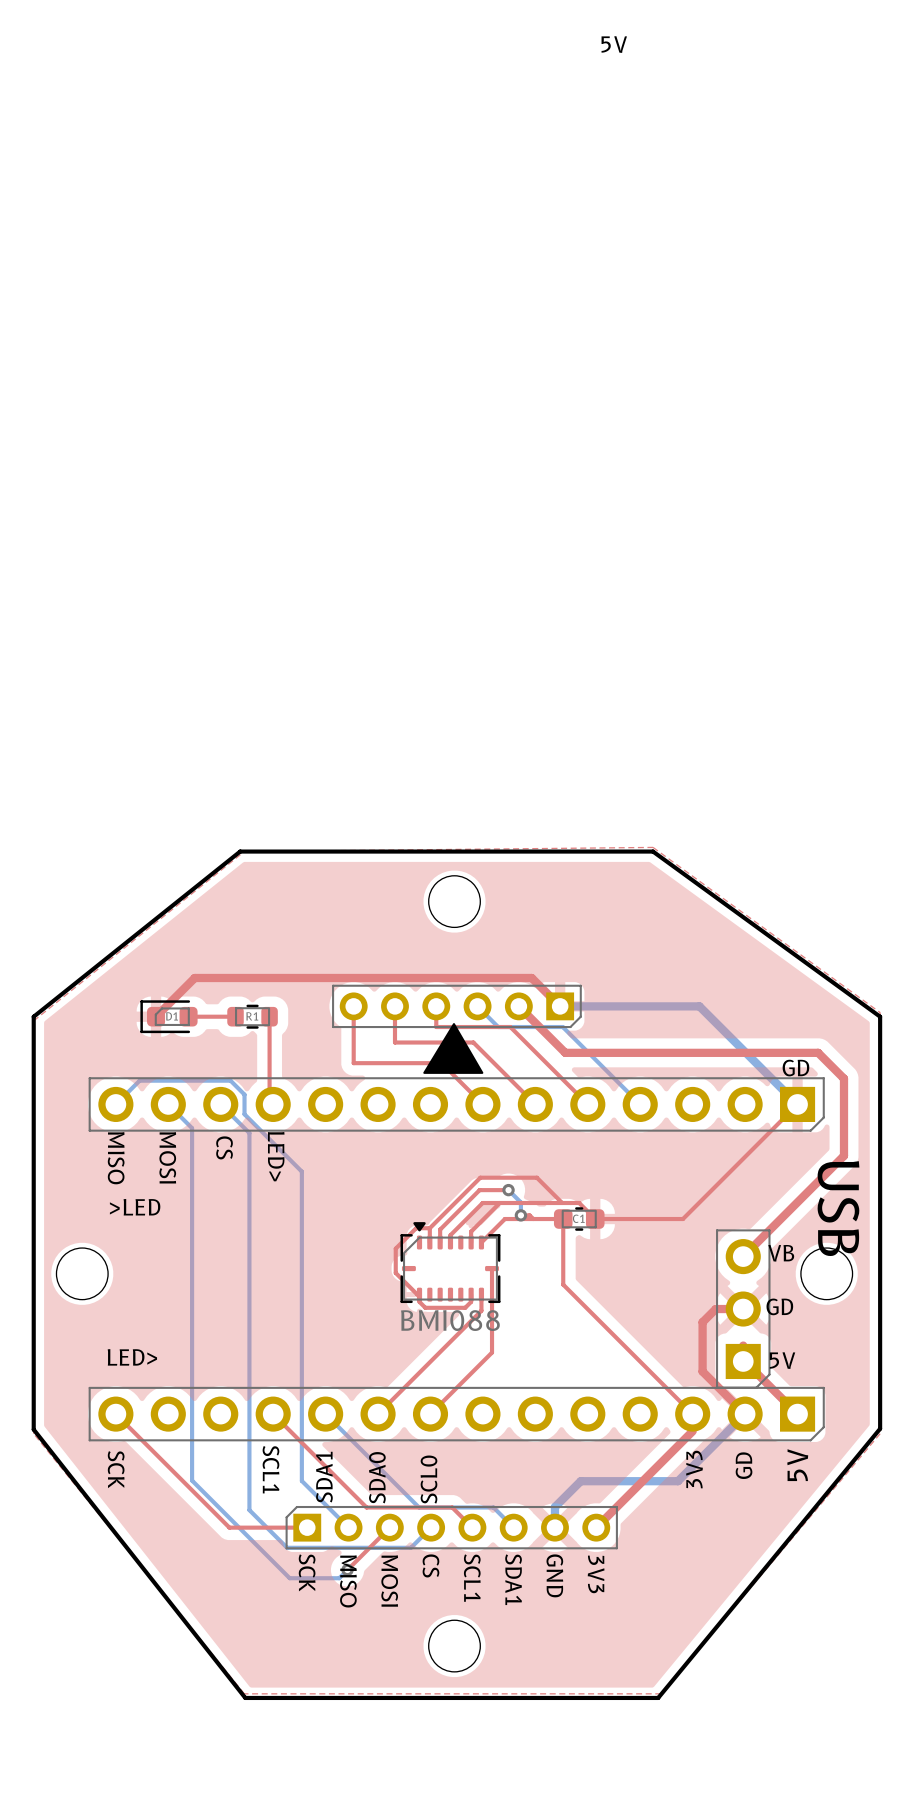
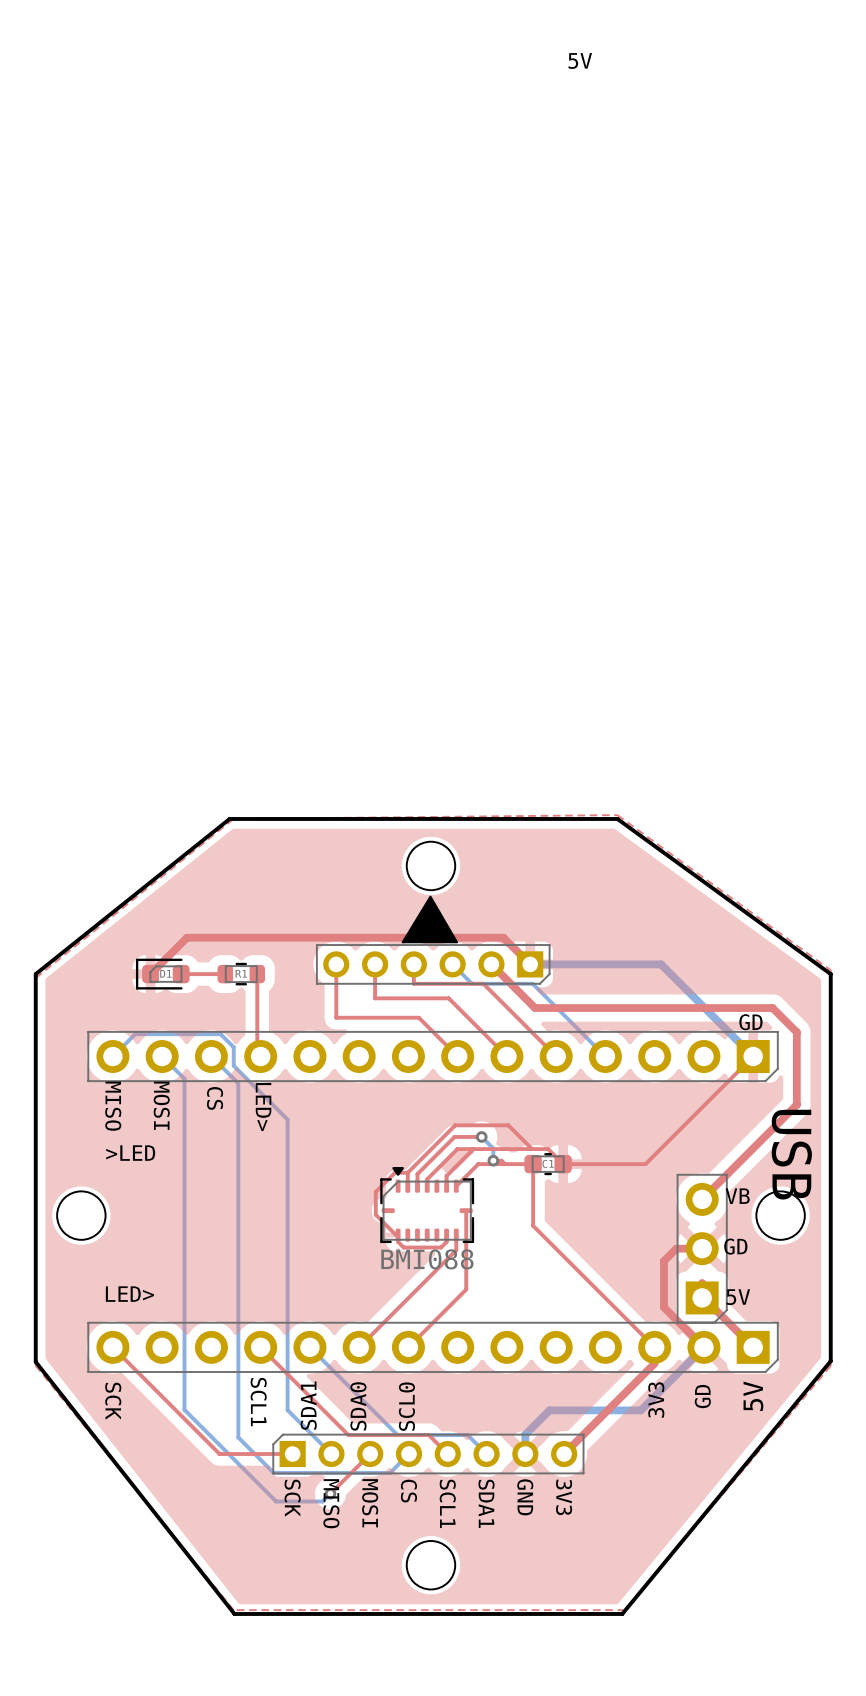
drawing position: (453, 1048) -> (429, 919)

